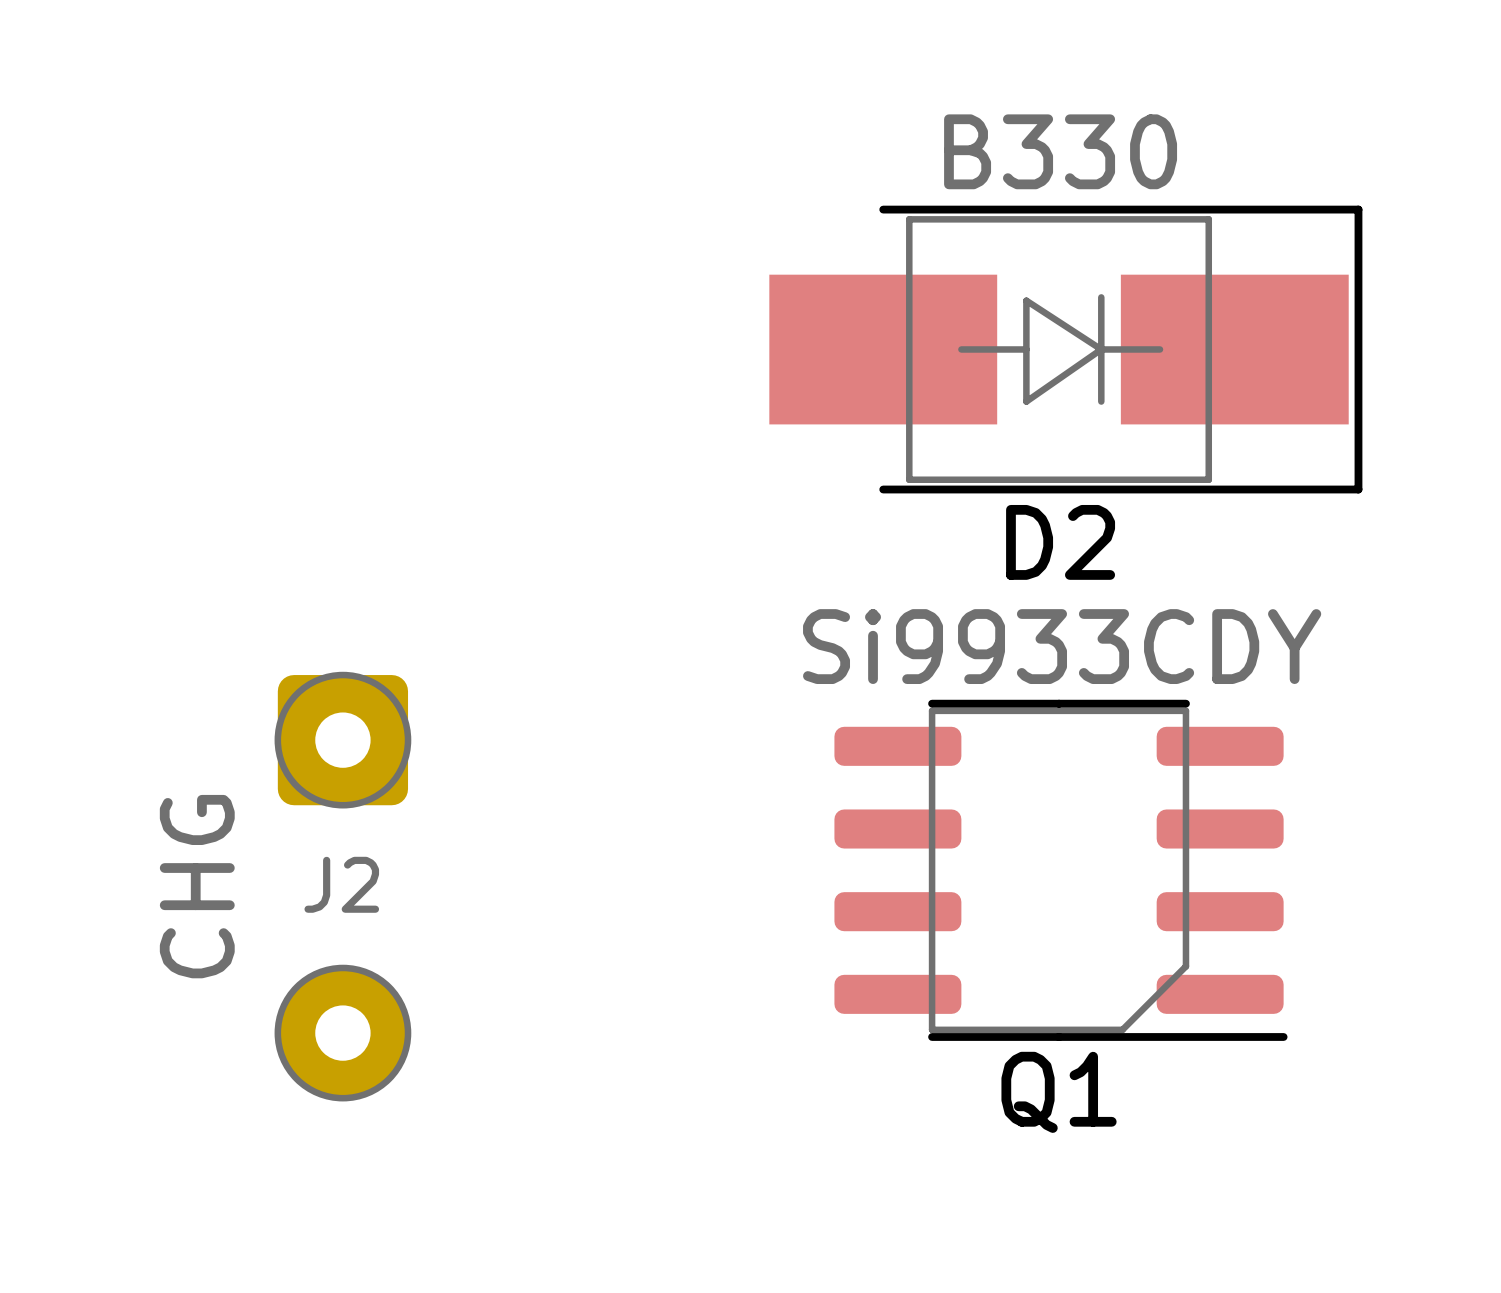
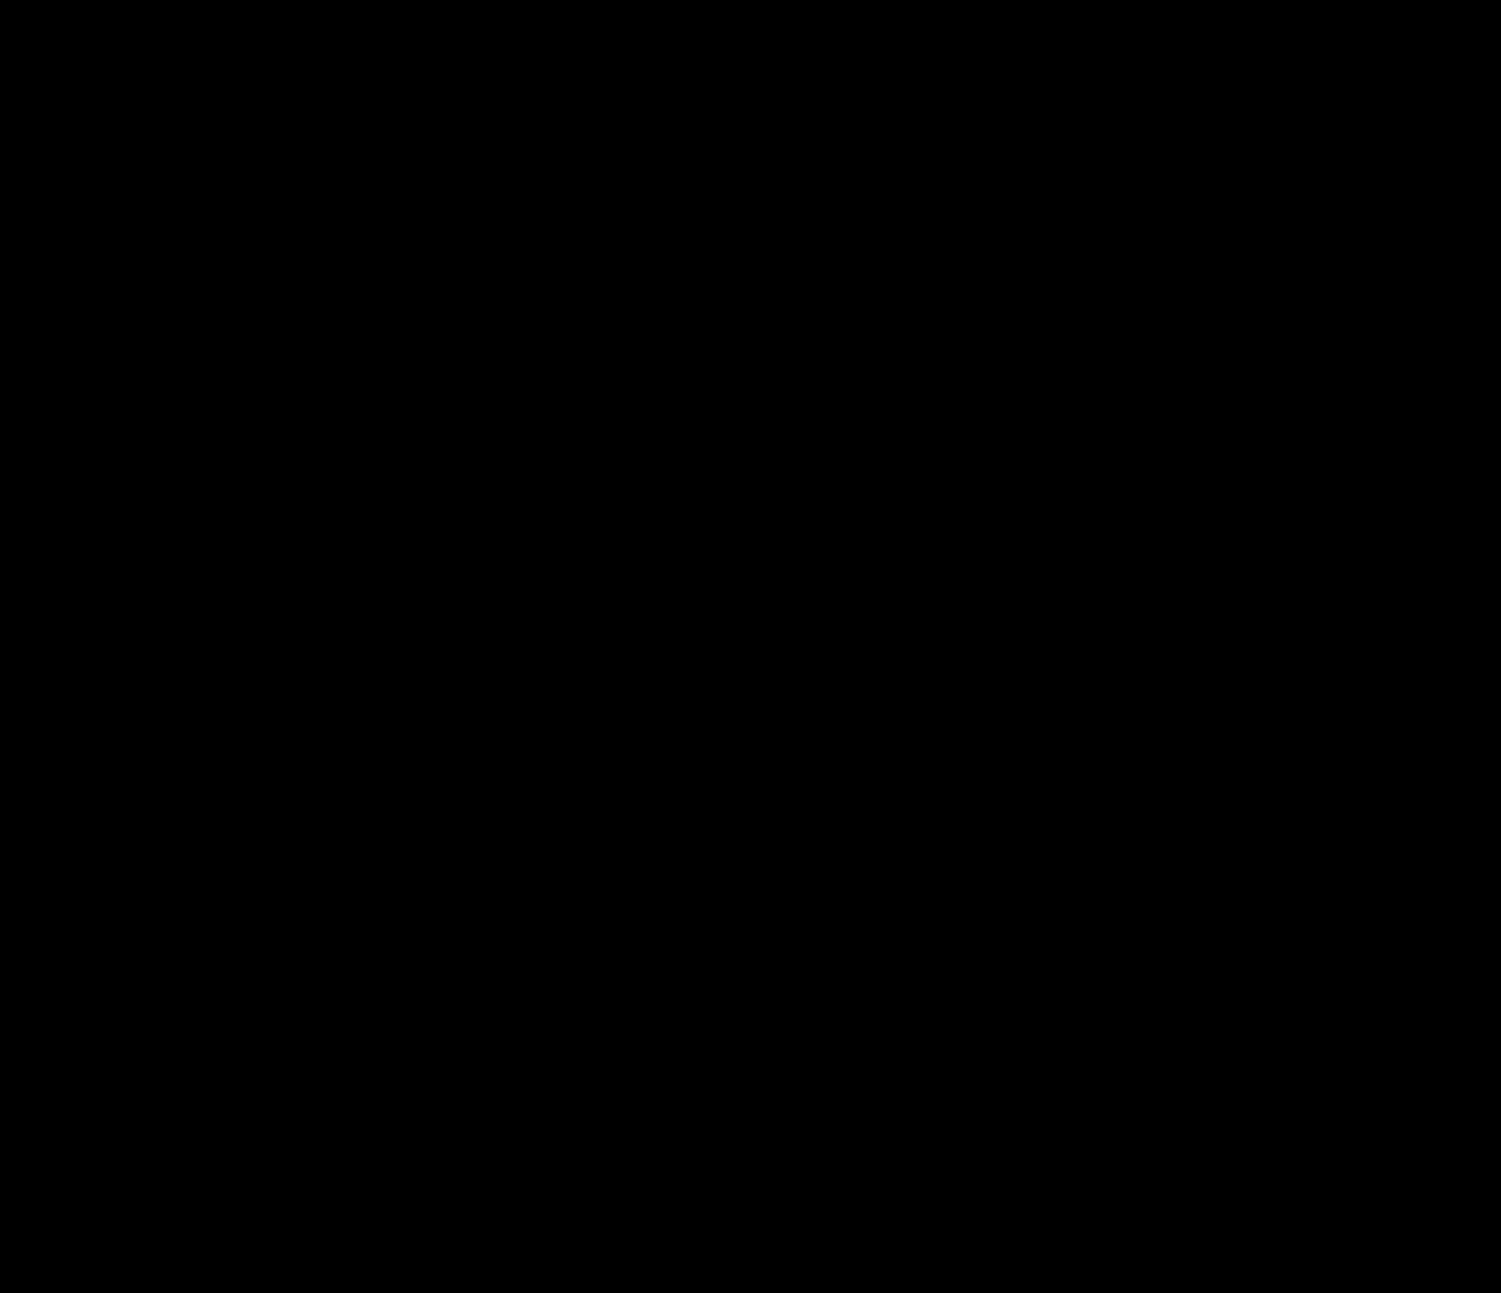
D2: B330 (1065, 349) -> none
Q1: Si9933CDY (1060, 870) -> none
J2: CHG (342, 886) -> none

